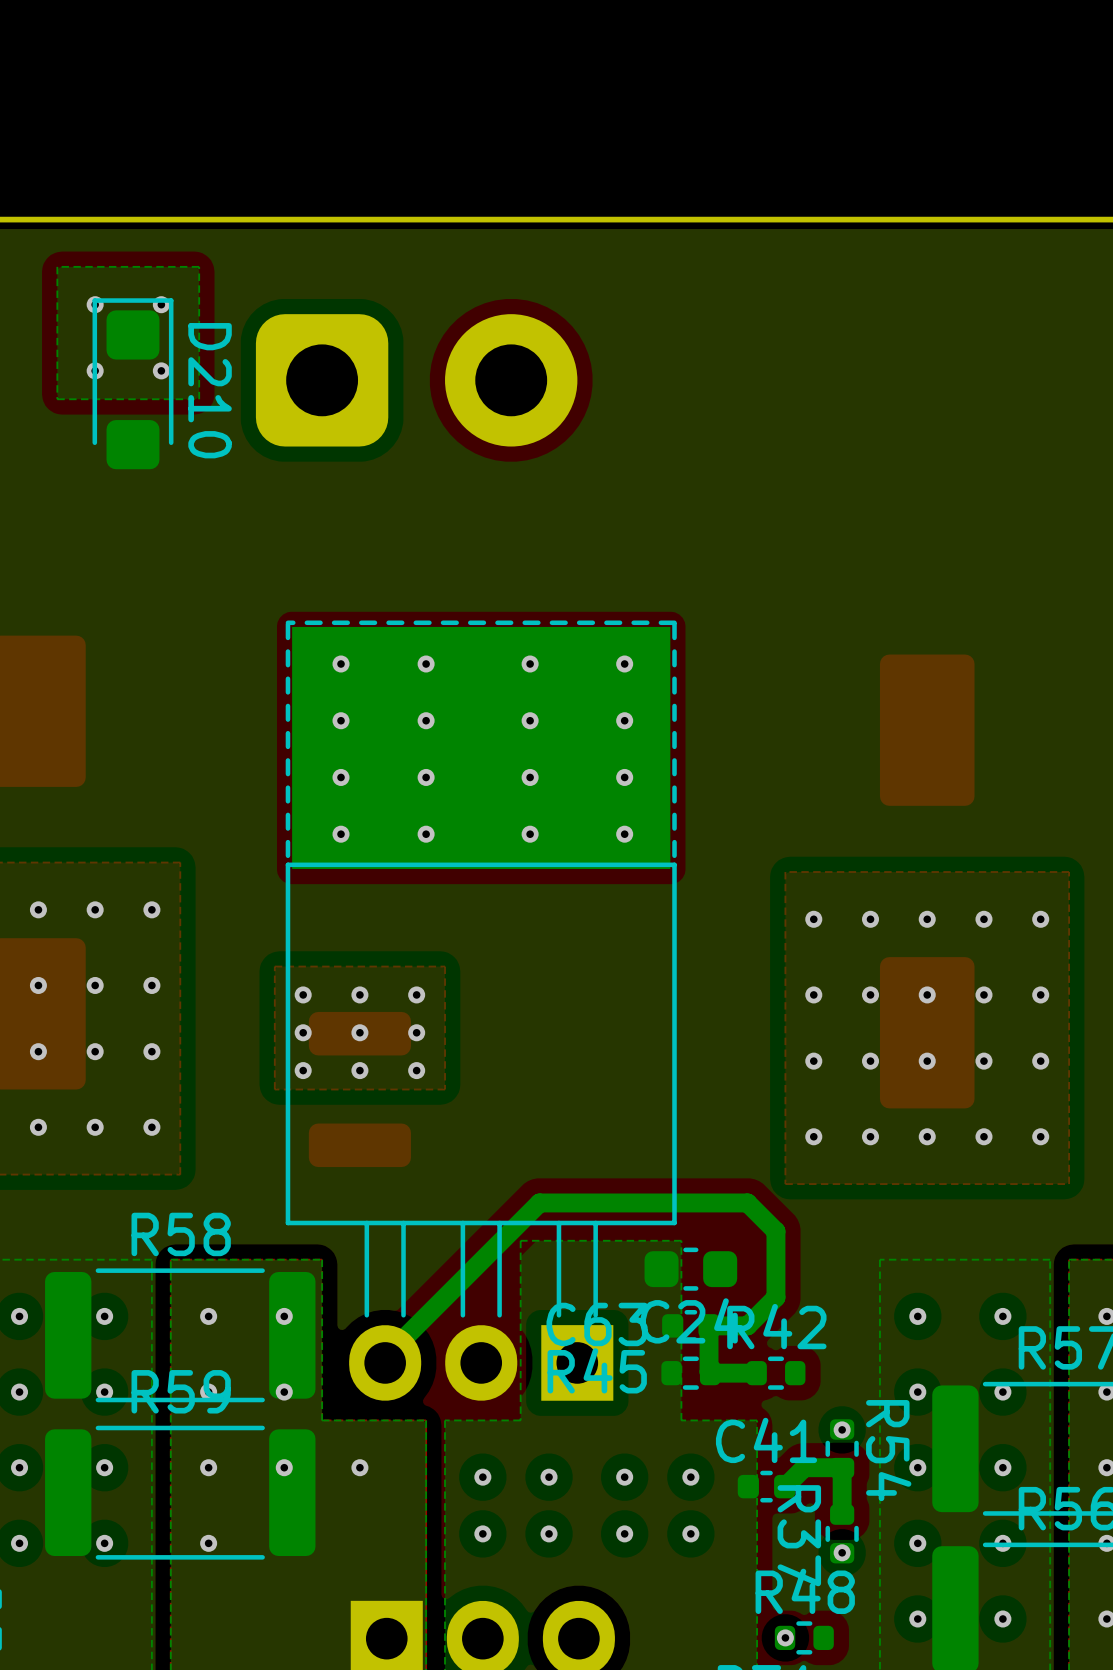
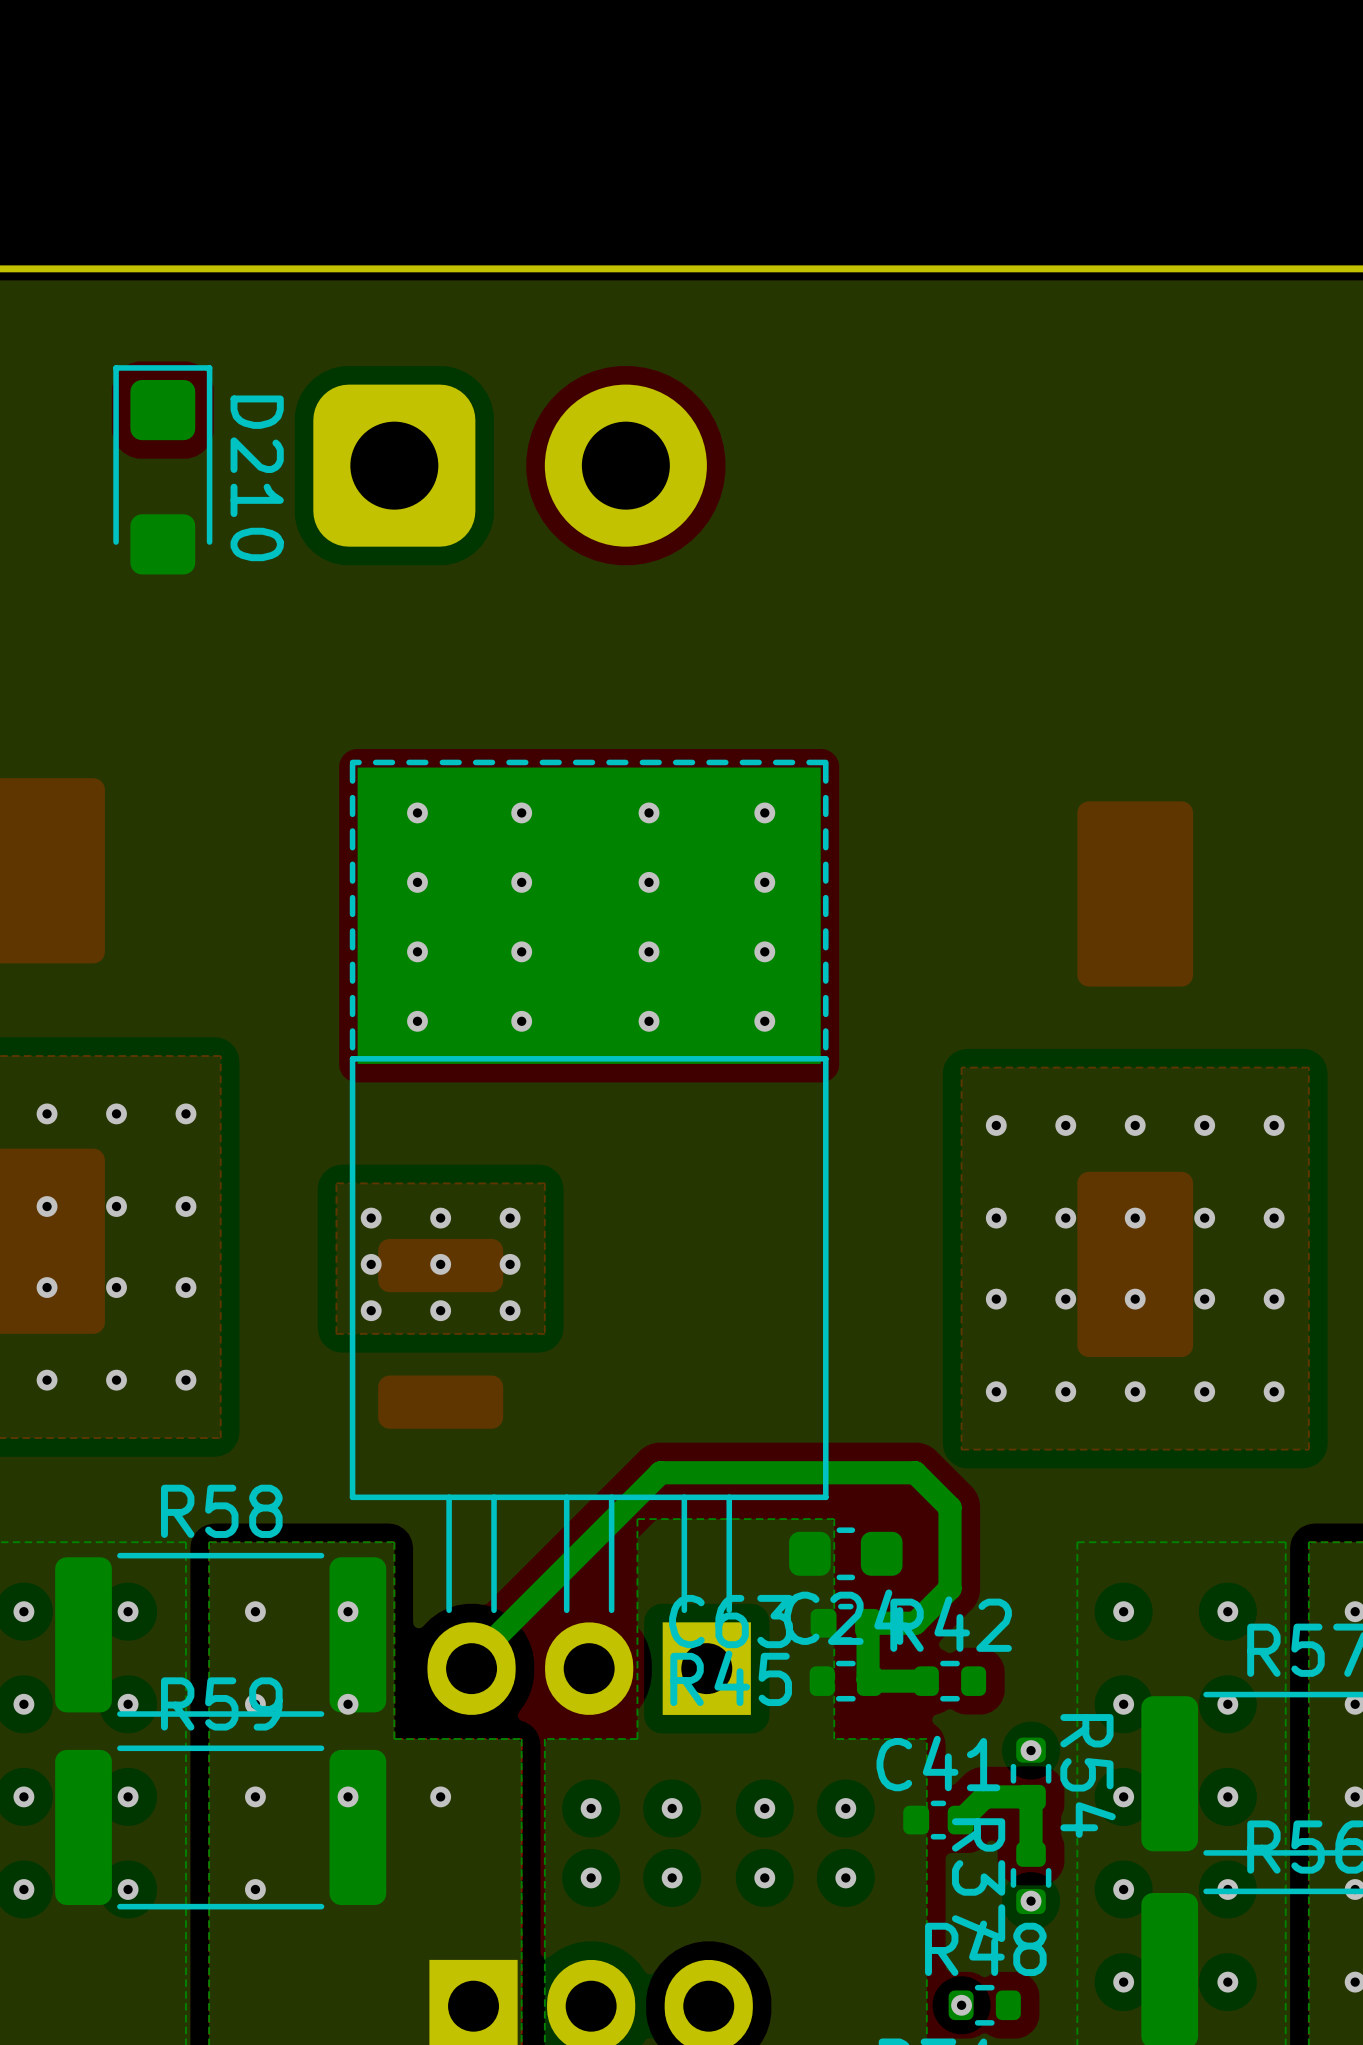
bottom zone outline: (199, 266) (57, 266) (57, 399) (199, 399) (199, 266) -> none
via: (95, 304) -> none
via: (161, 304) -> none
via: (95, 370) -> none
via: (161, 370) -> none

